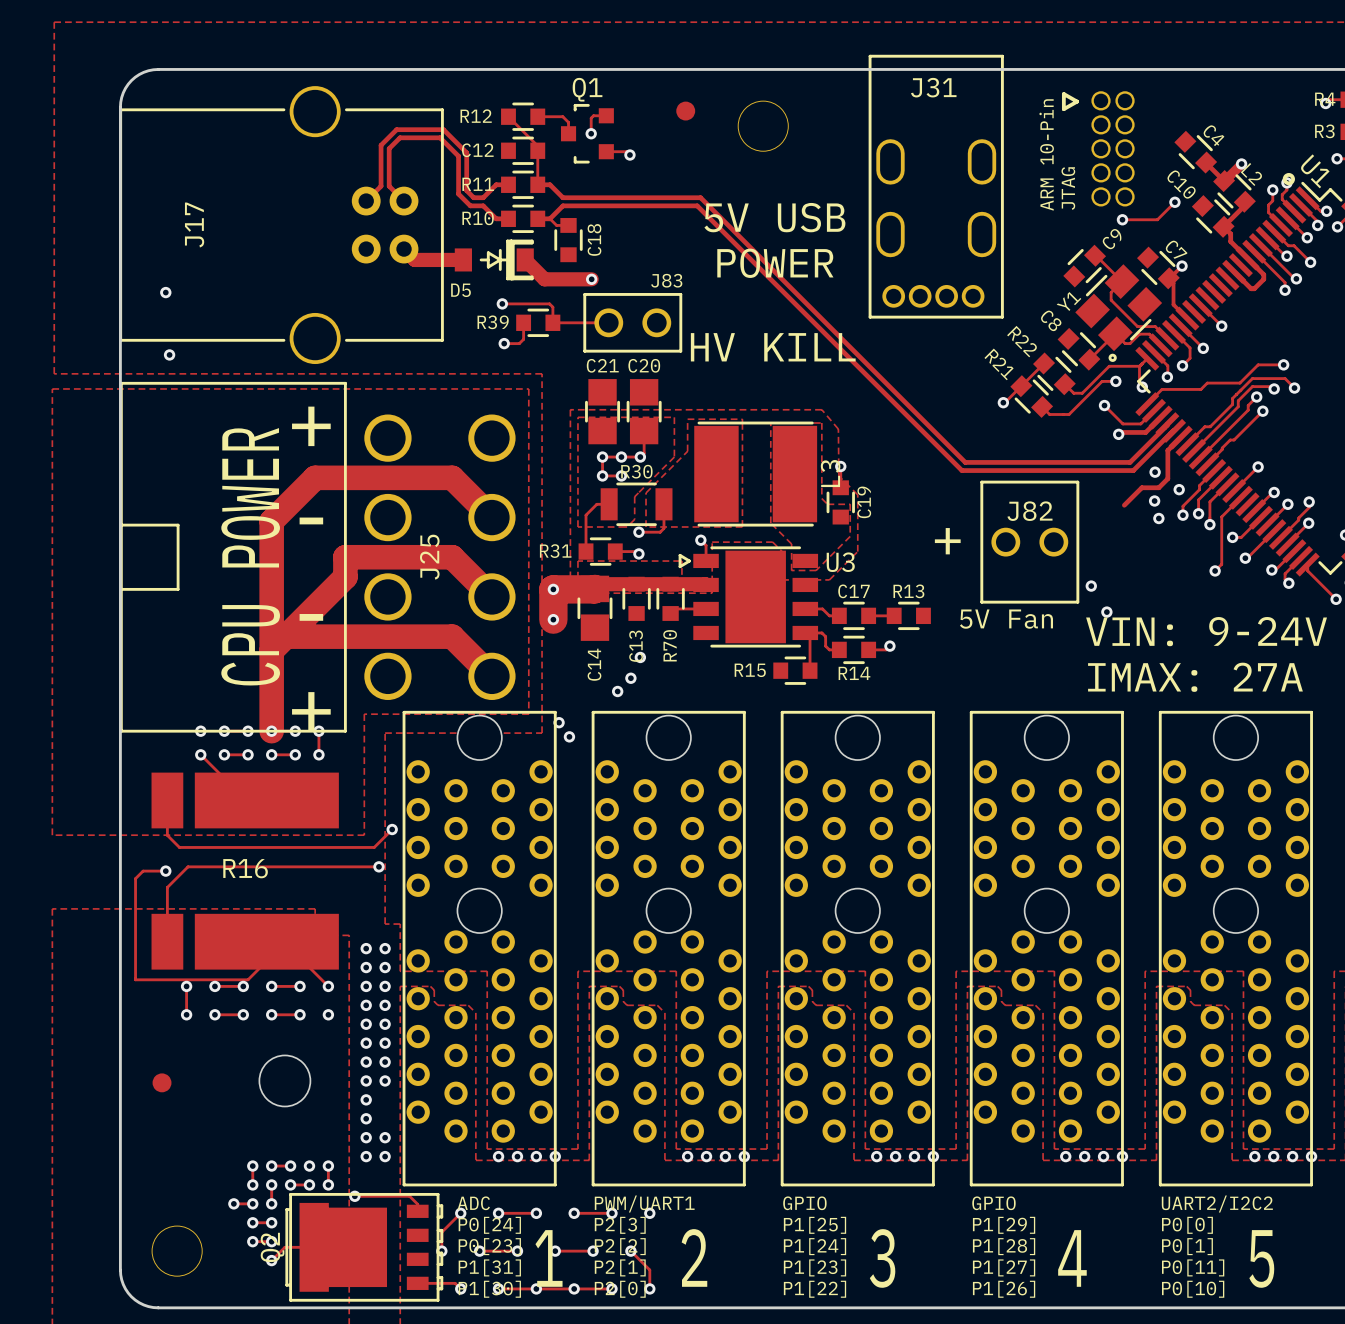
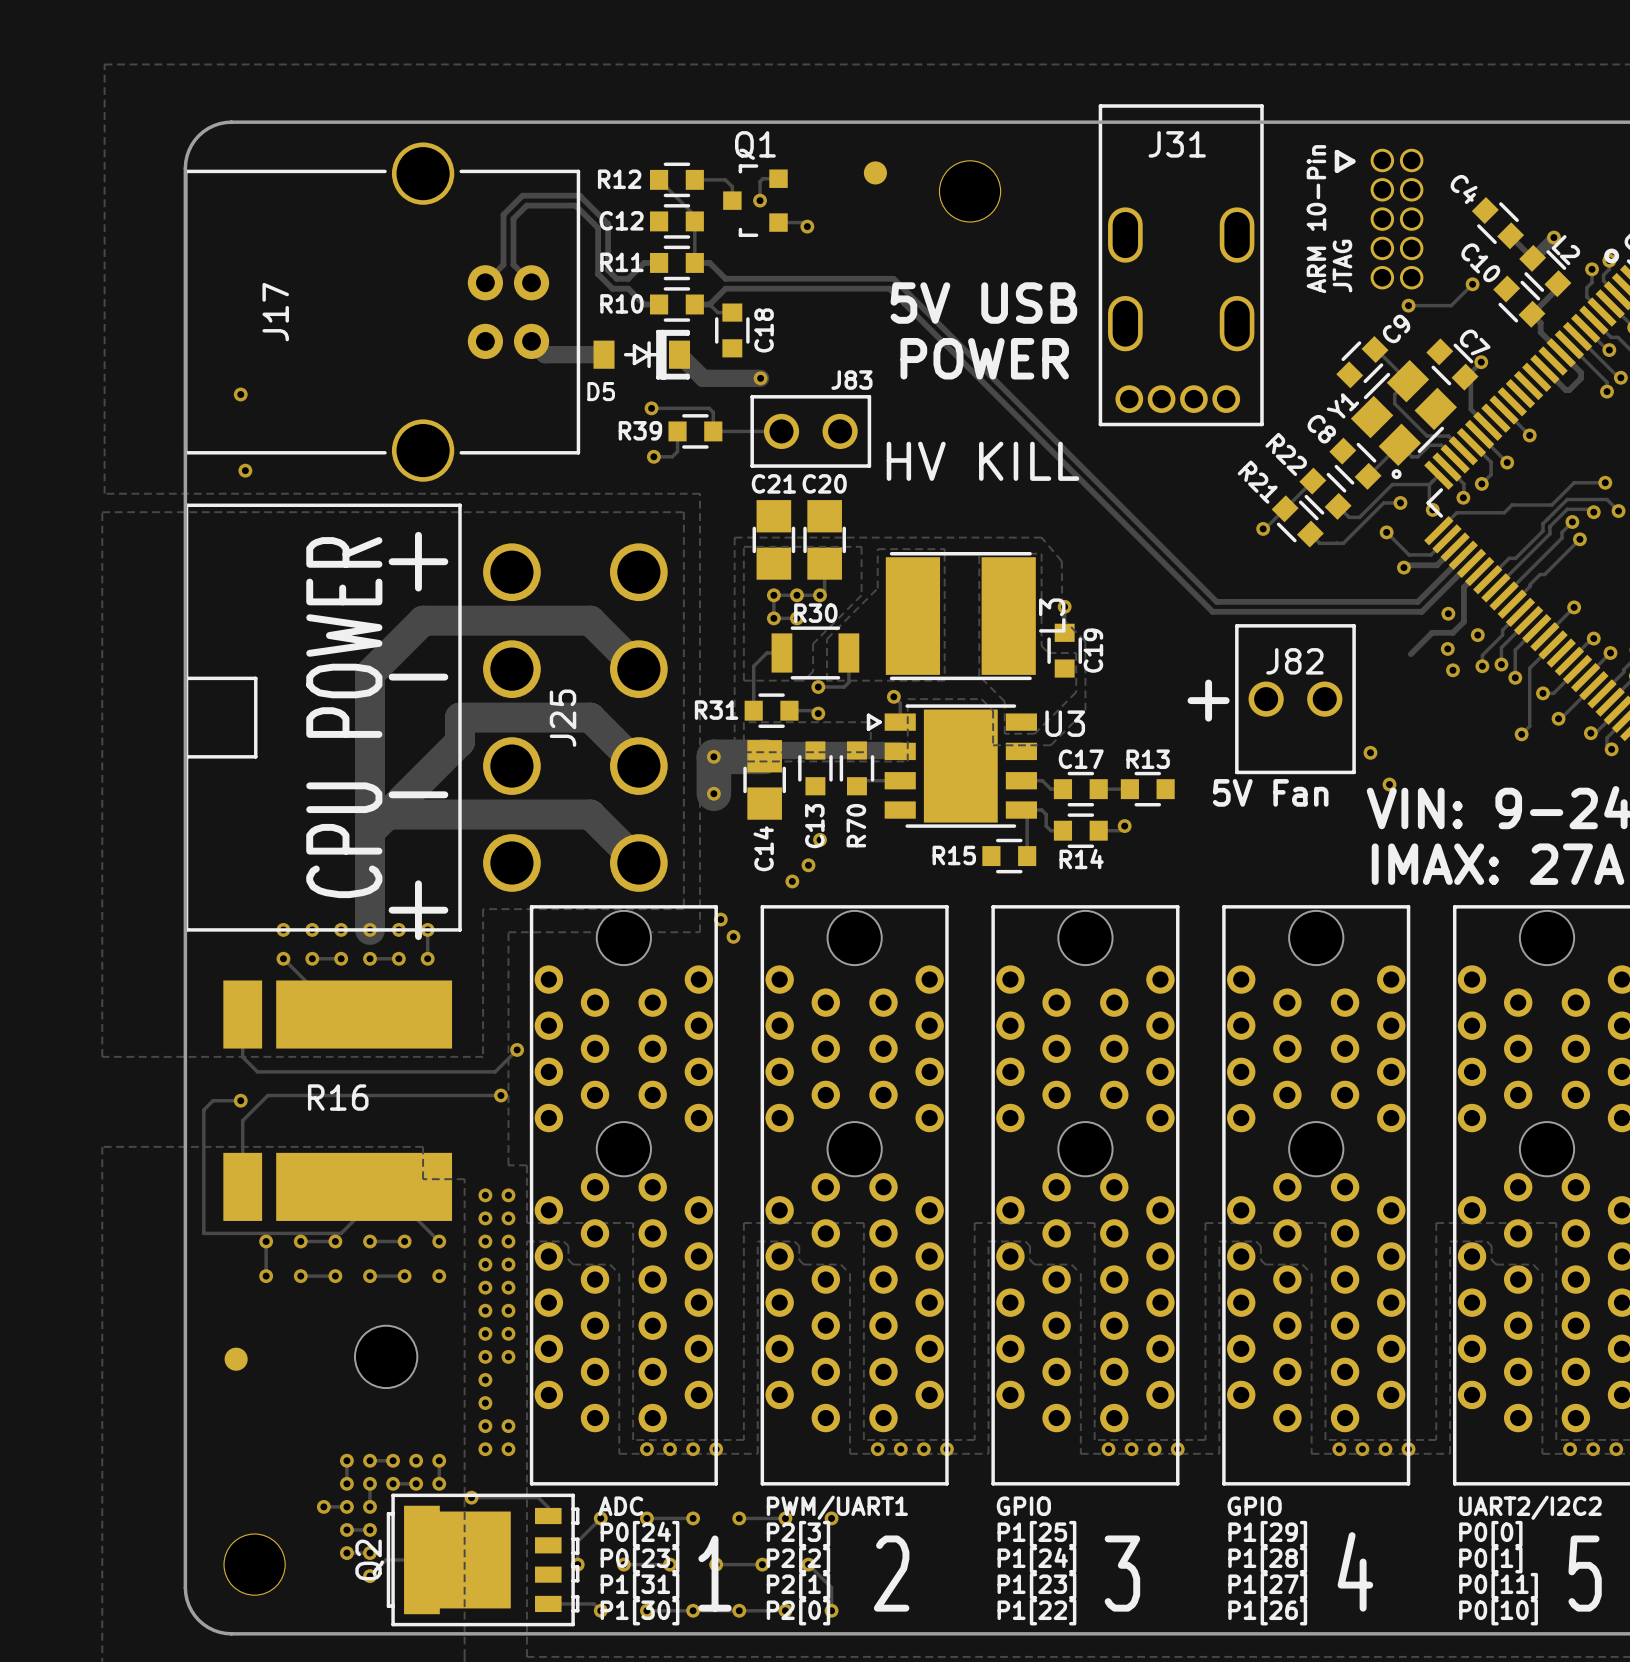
C4 name position: C4 (1213, 135) -> C4 (1464, 189)

